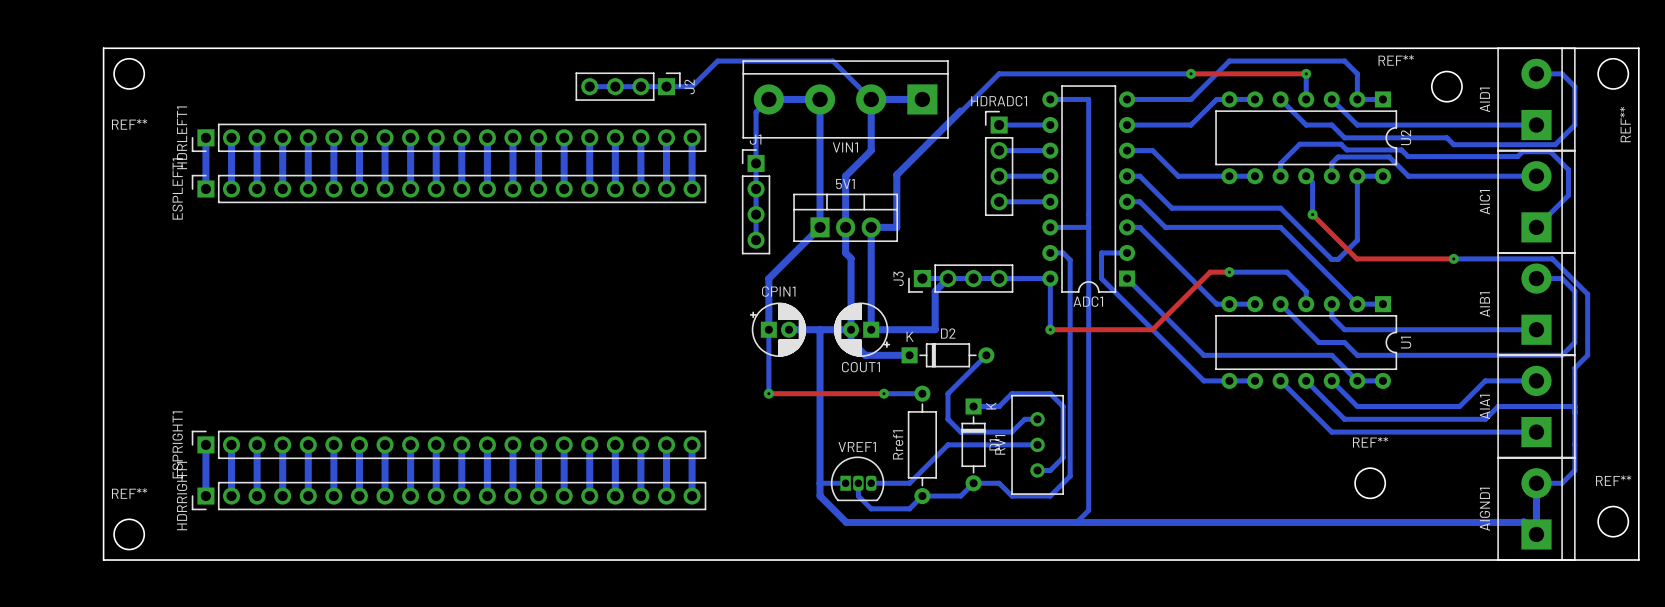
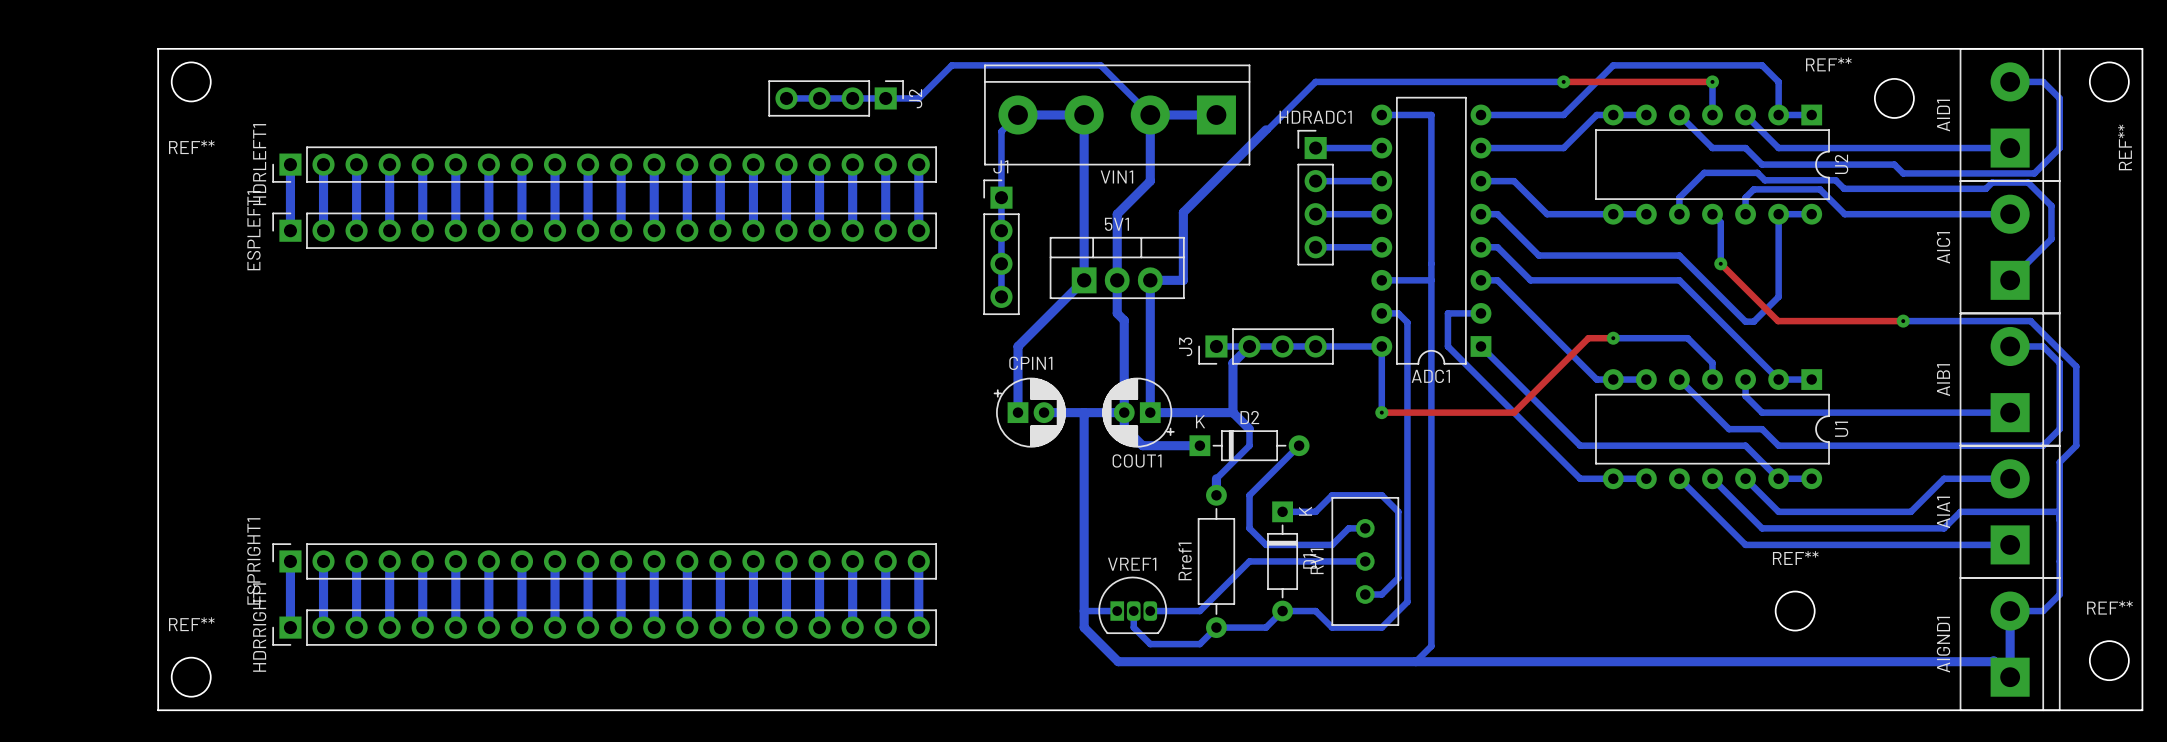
bottom track: (768, 329) (768, 393) -> none
top track: (768, 393) (884, 393) -> none
via: (768, 393) -> none
bottom track: (884, 393) (922, 393) -> (1232, 412) (1249, 429) (1249, 445) (1216, 478) (1216, 495)
via: (884, 393) -> none

